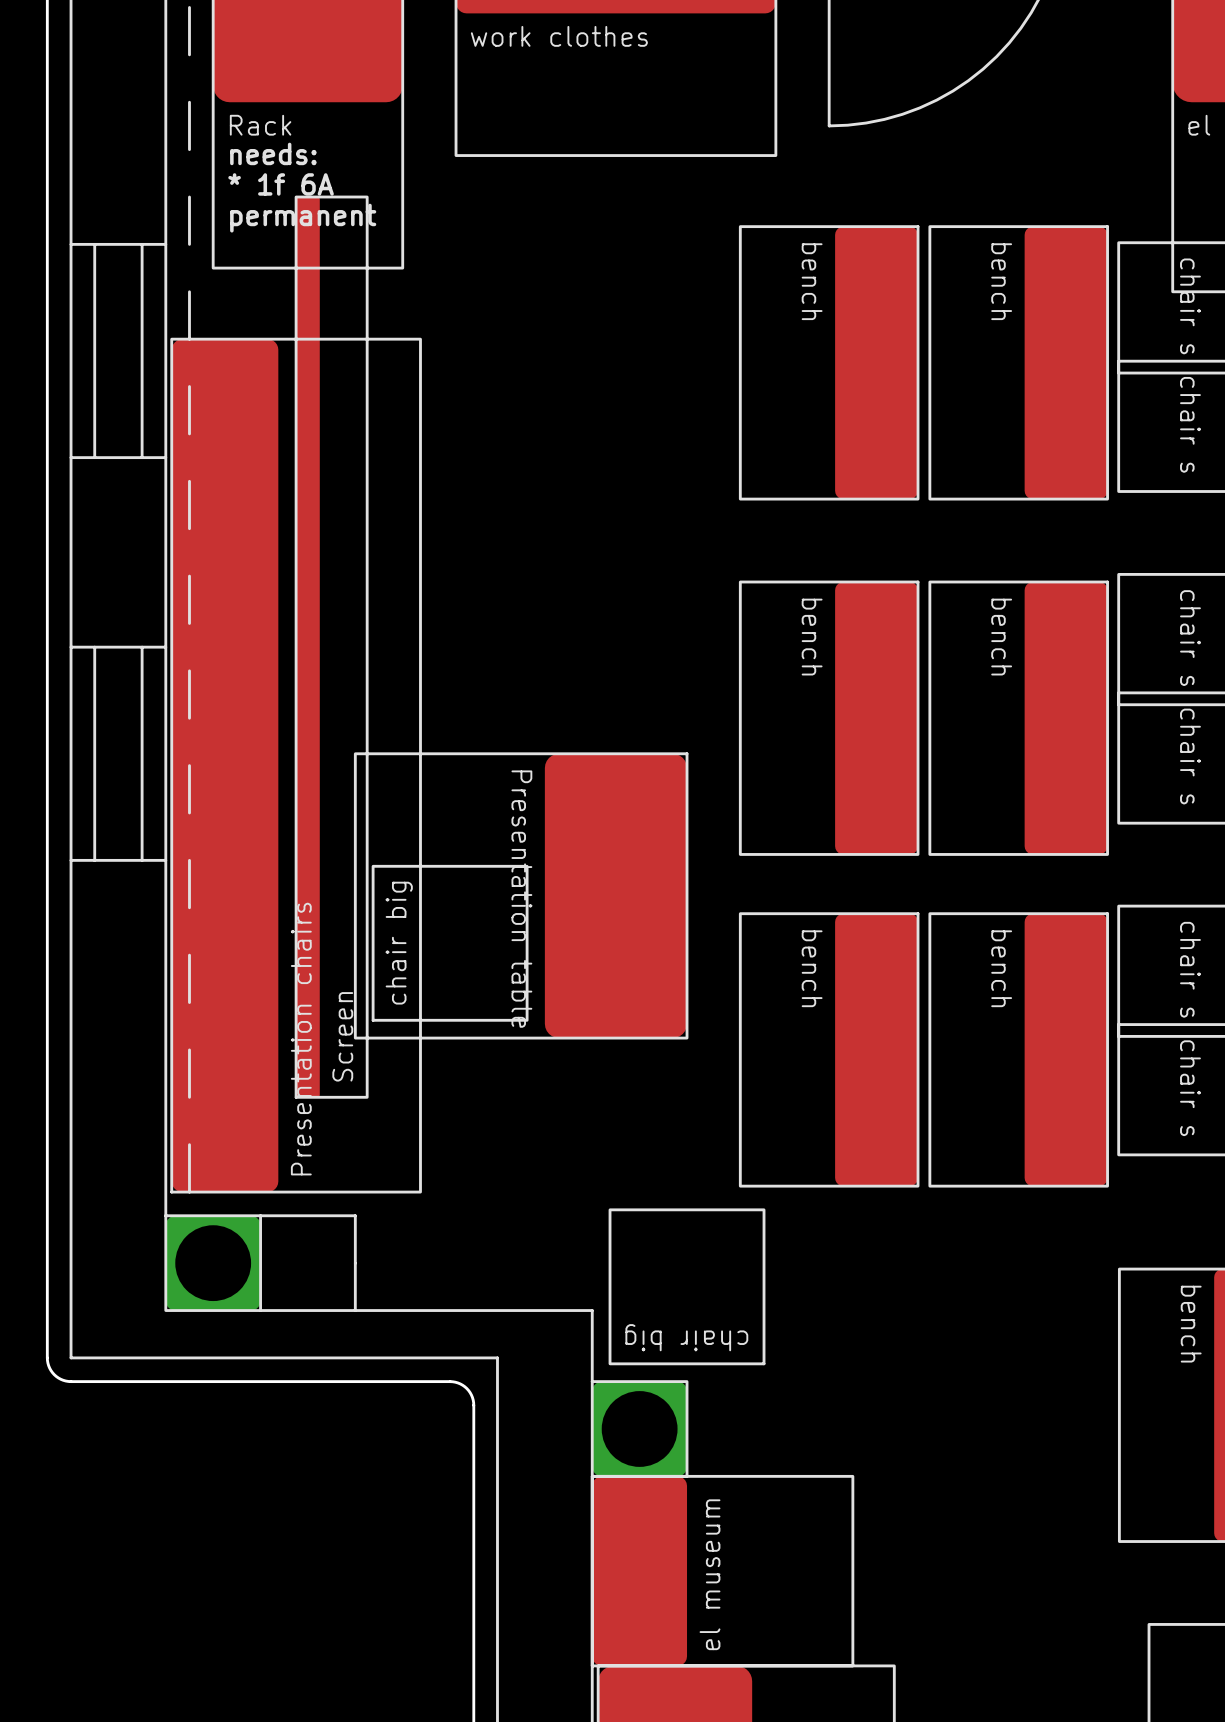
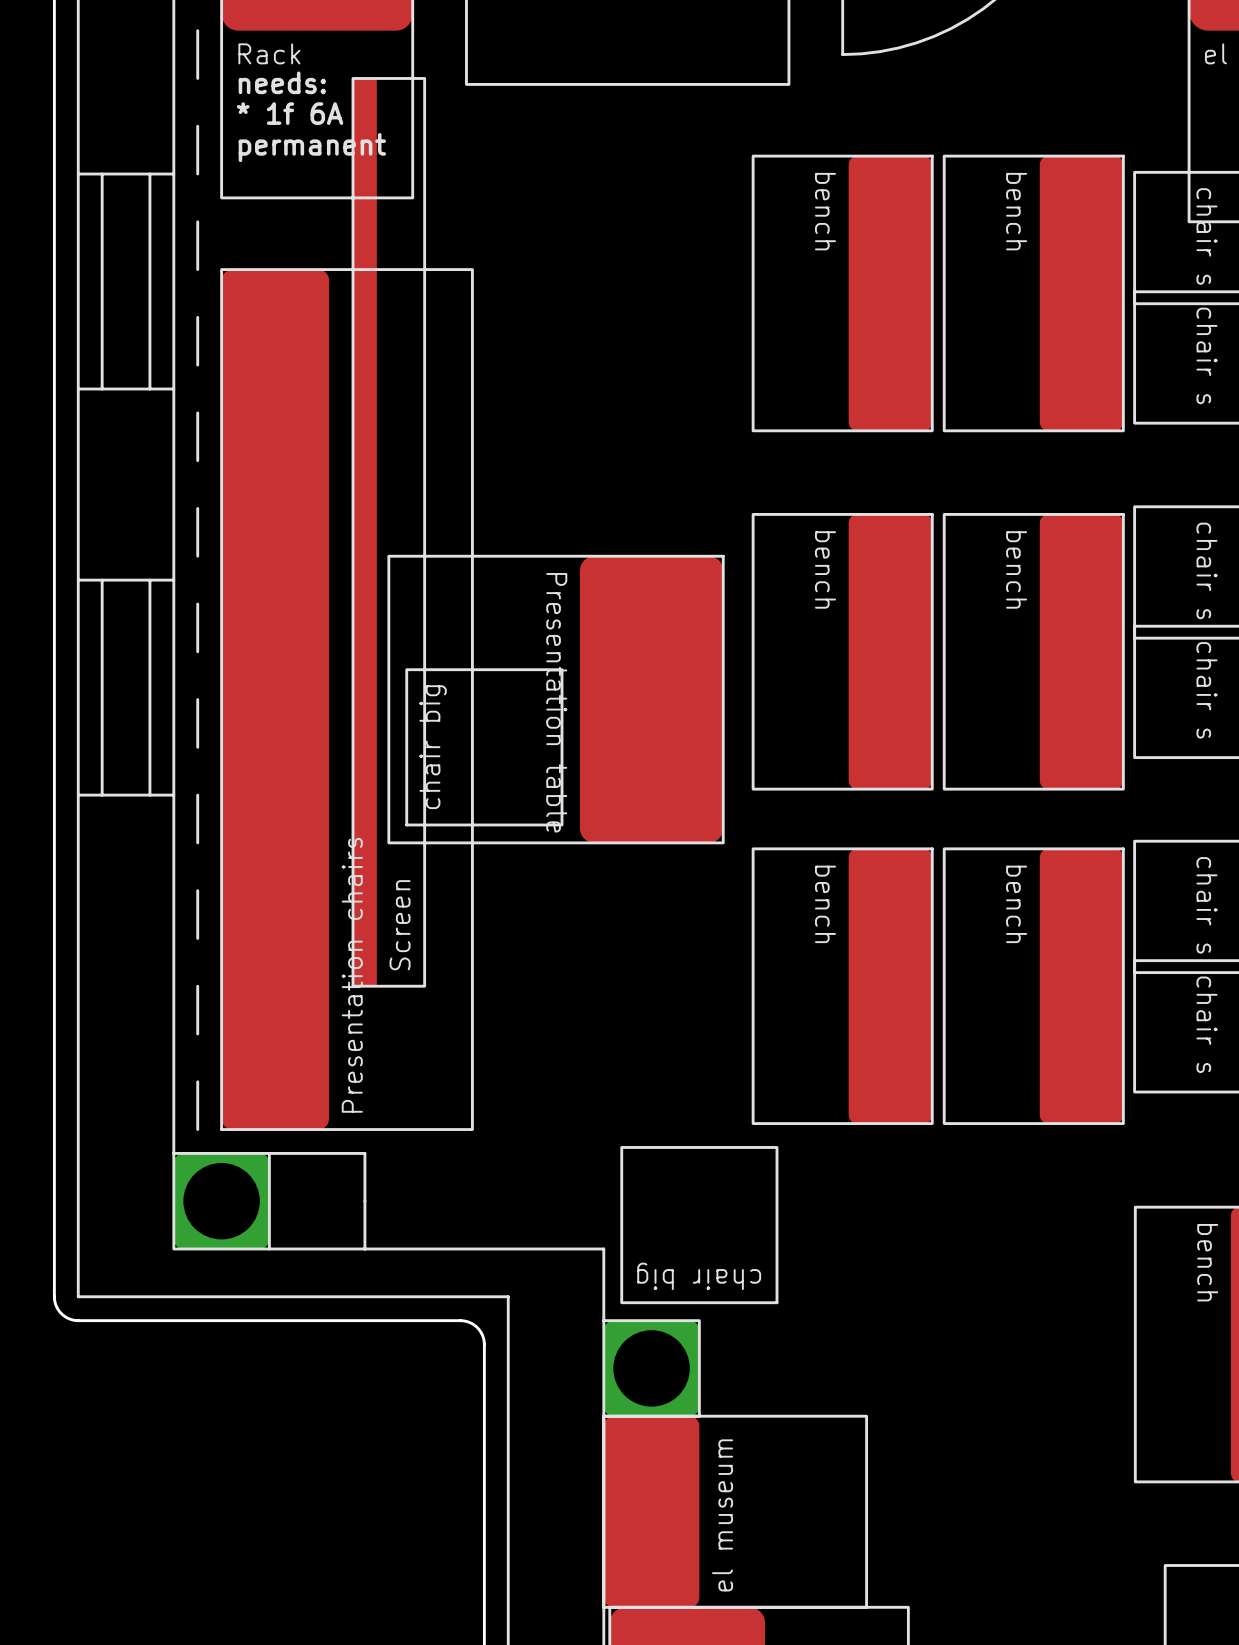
part position: (331, 647) -> (388, 532)
part position: (296, 765) -> (347, 699)
part position: (521, 895) -> (556, 699)
drawing position: (450, 943) -> (484, 747)

